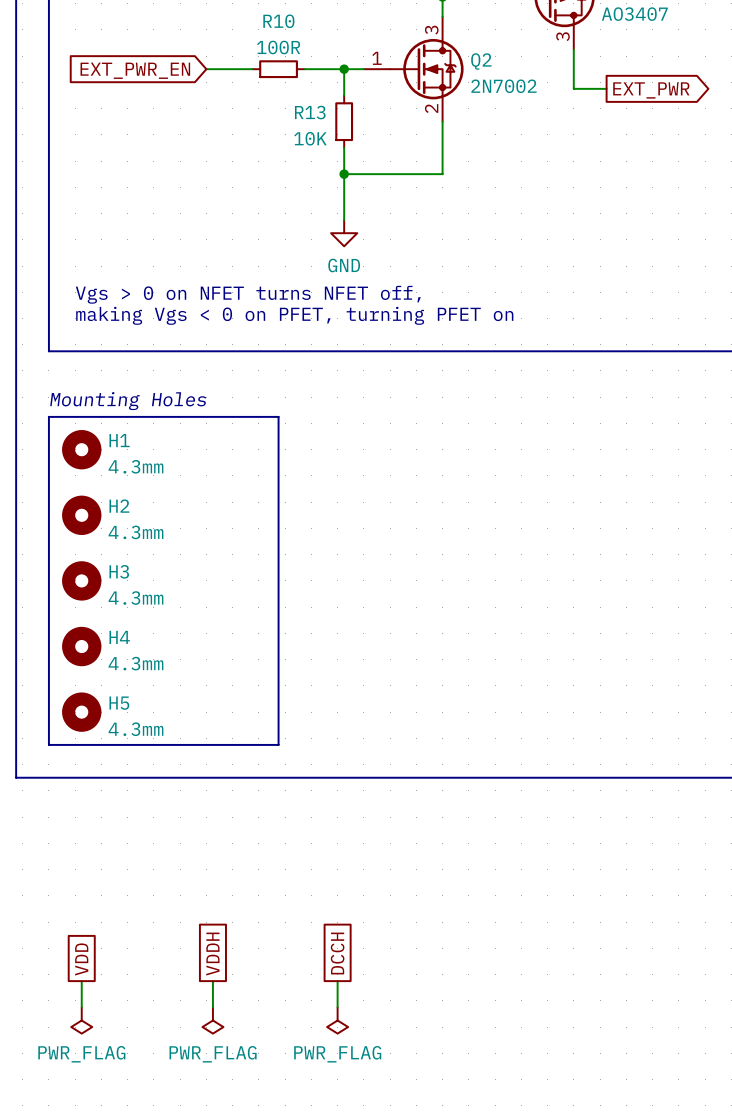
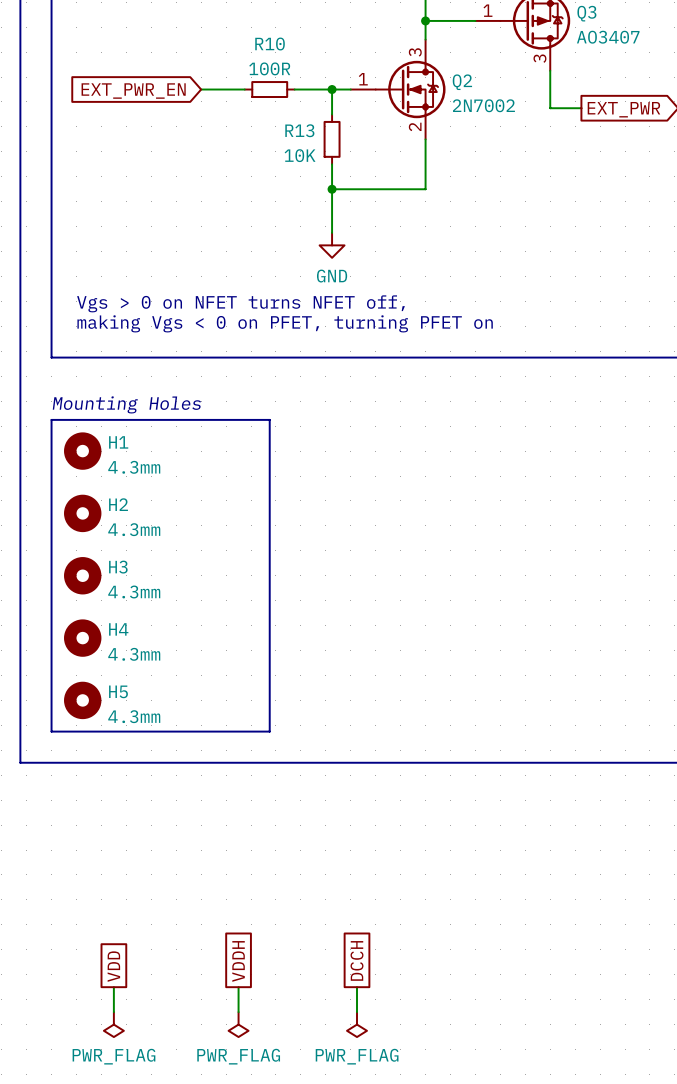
global label position: DCCH (337, 953) -> DCCH (357, 960)
global label position: VDDH (212, 954) -> VDDH (238, 961)
global label position: VDD (81, 959) -> VDD (113, 966)
wire: (81, 981) (81, 1007) -> (113, 987) (113, 1012)
wire: (212, 981) (212, 1007) -> (238, 987) (238, 1012)
wire: (337, 981) (337, 1007) -> (357, 987) (357, 1012)
power symbol position: PWR_FLAG (81, 1020) -> PWR_FLAG (113, 1024)
power symbol position: PWR_FLAG (212, 1020) -> PWR_FLAG (238, 1024)
power symbol position: PWR_FLAG (337, 1020) -> PWR_FLAG (357, 1024)

